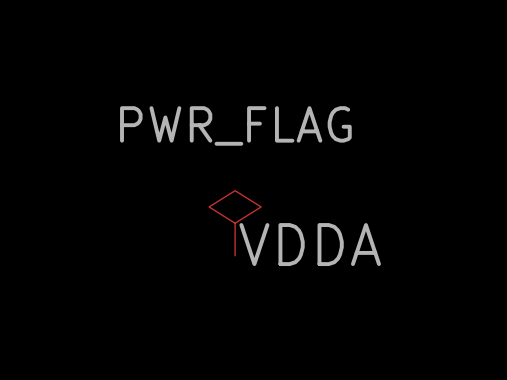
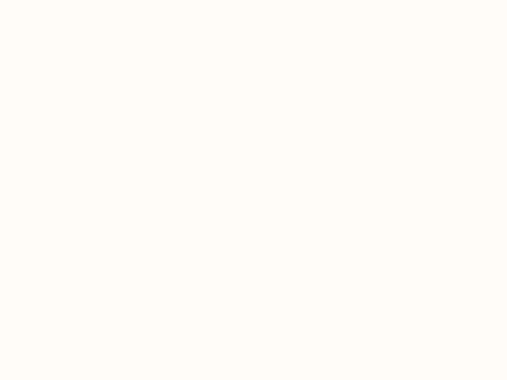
power symbol: PWR_FLAG (235, 223) -> none
label: VDDA (310, 244) -> none

